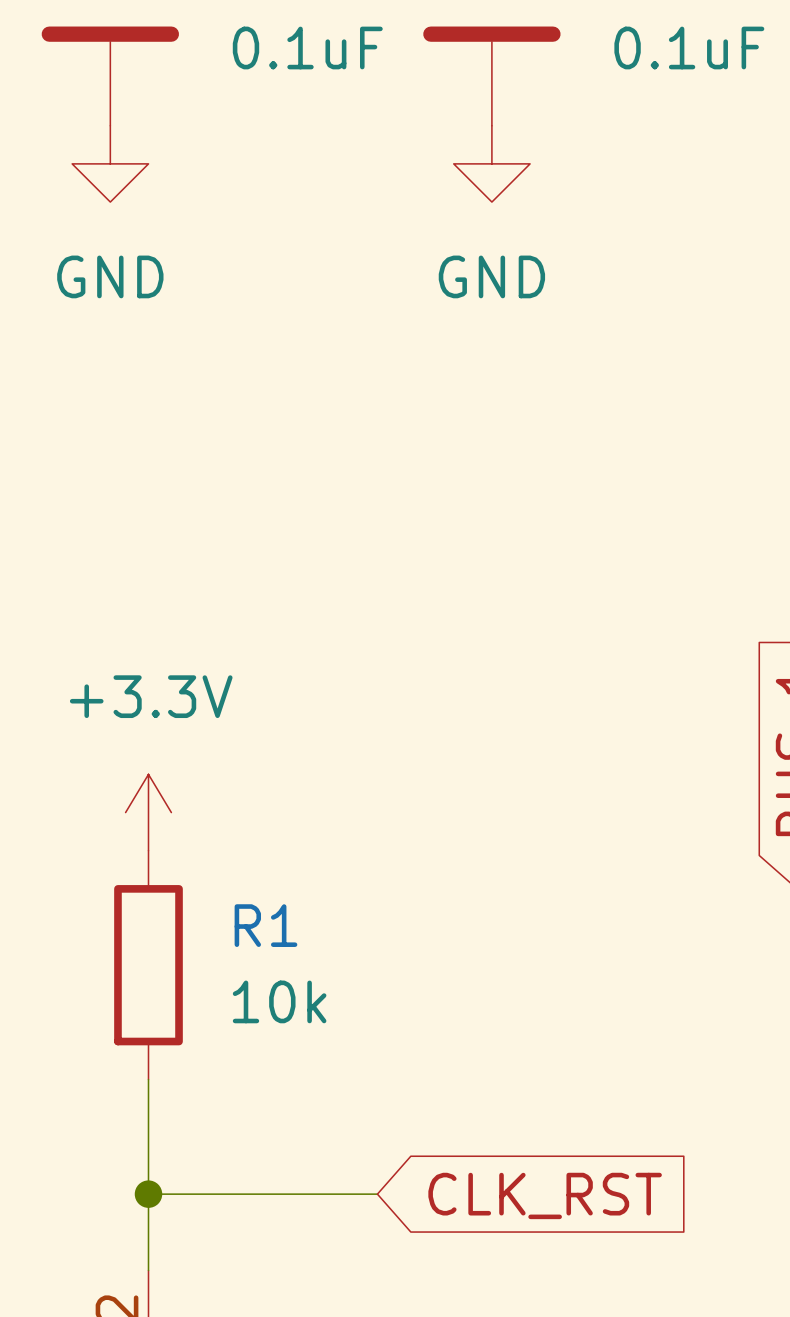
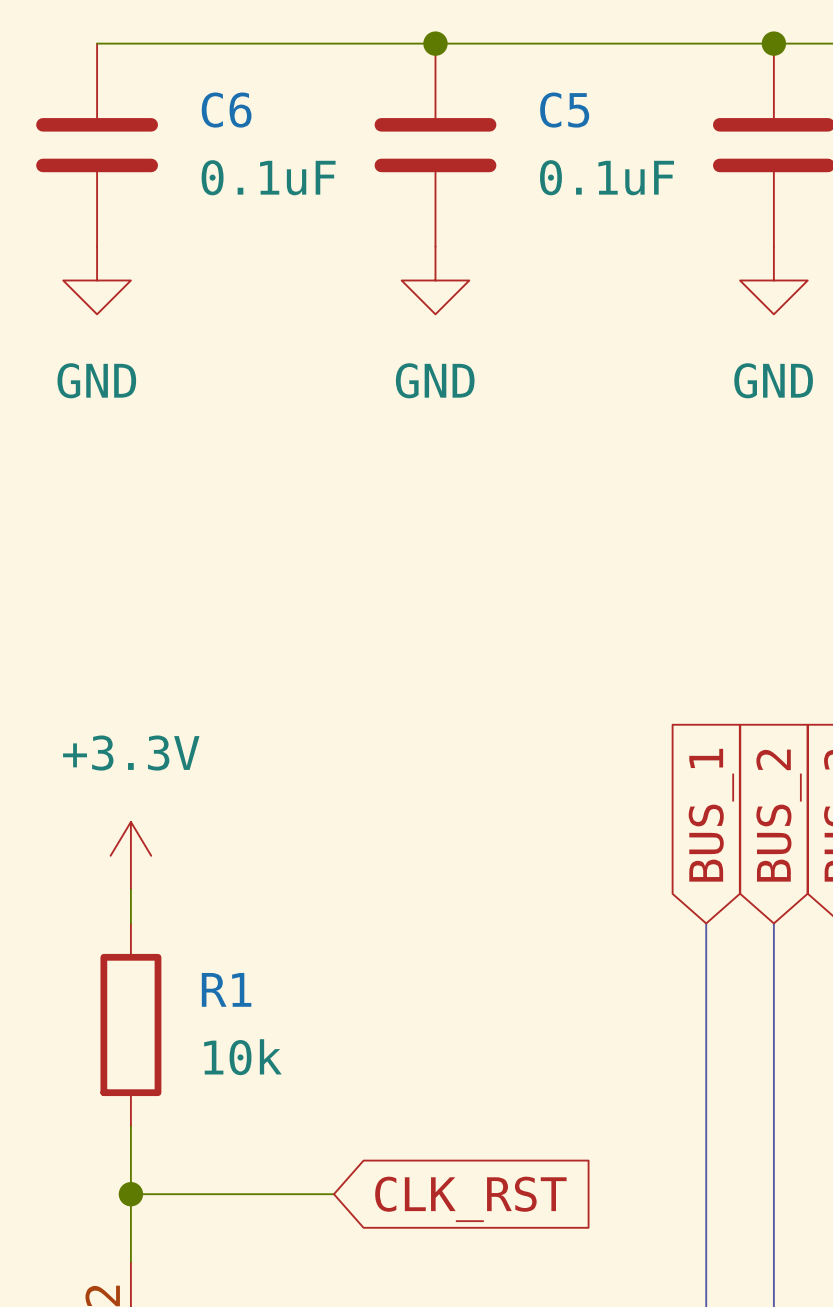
R1 position: (148, 965) -> (130, 1024)

